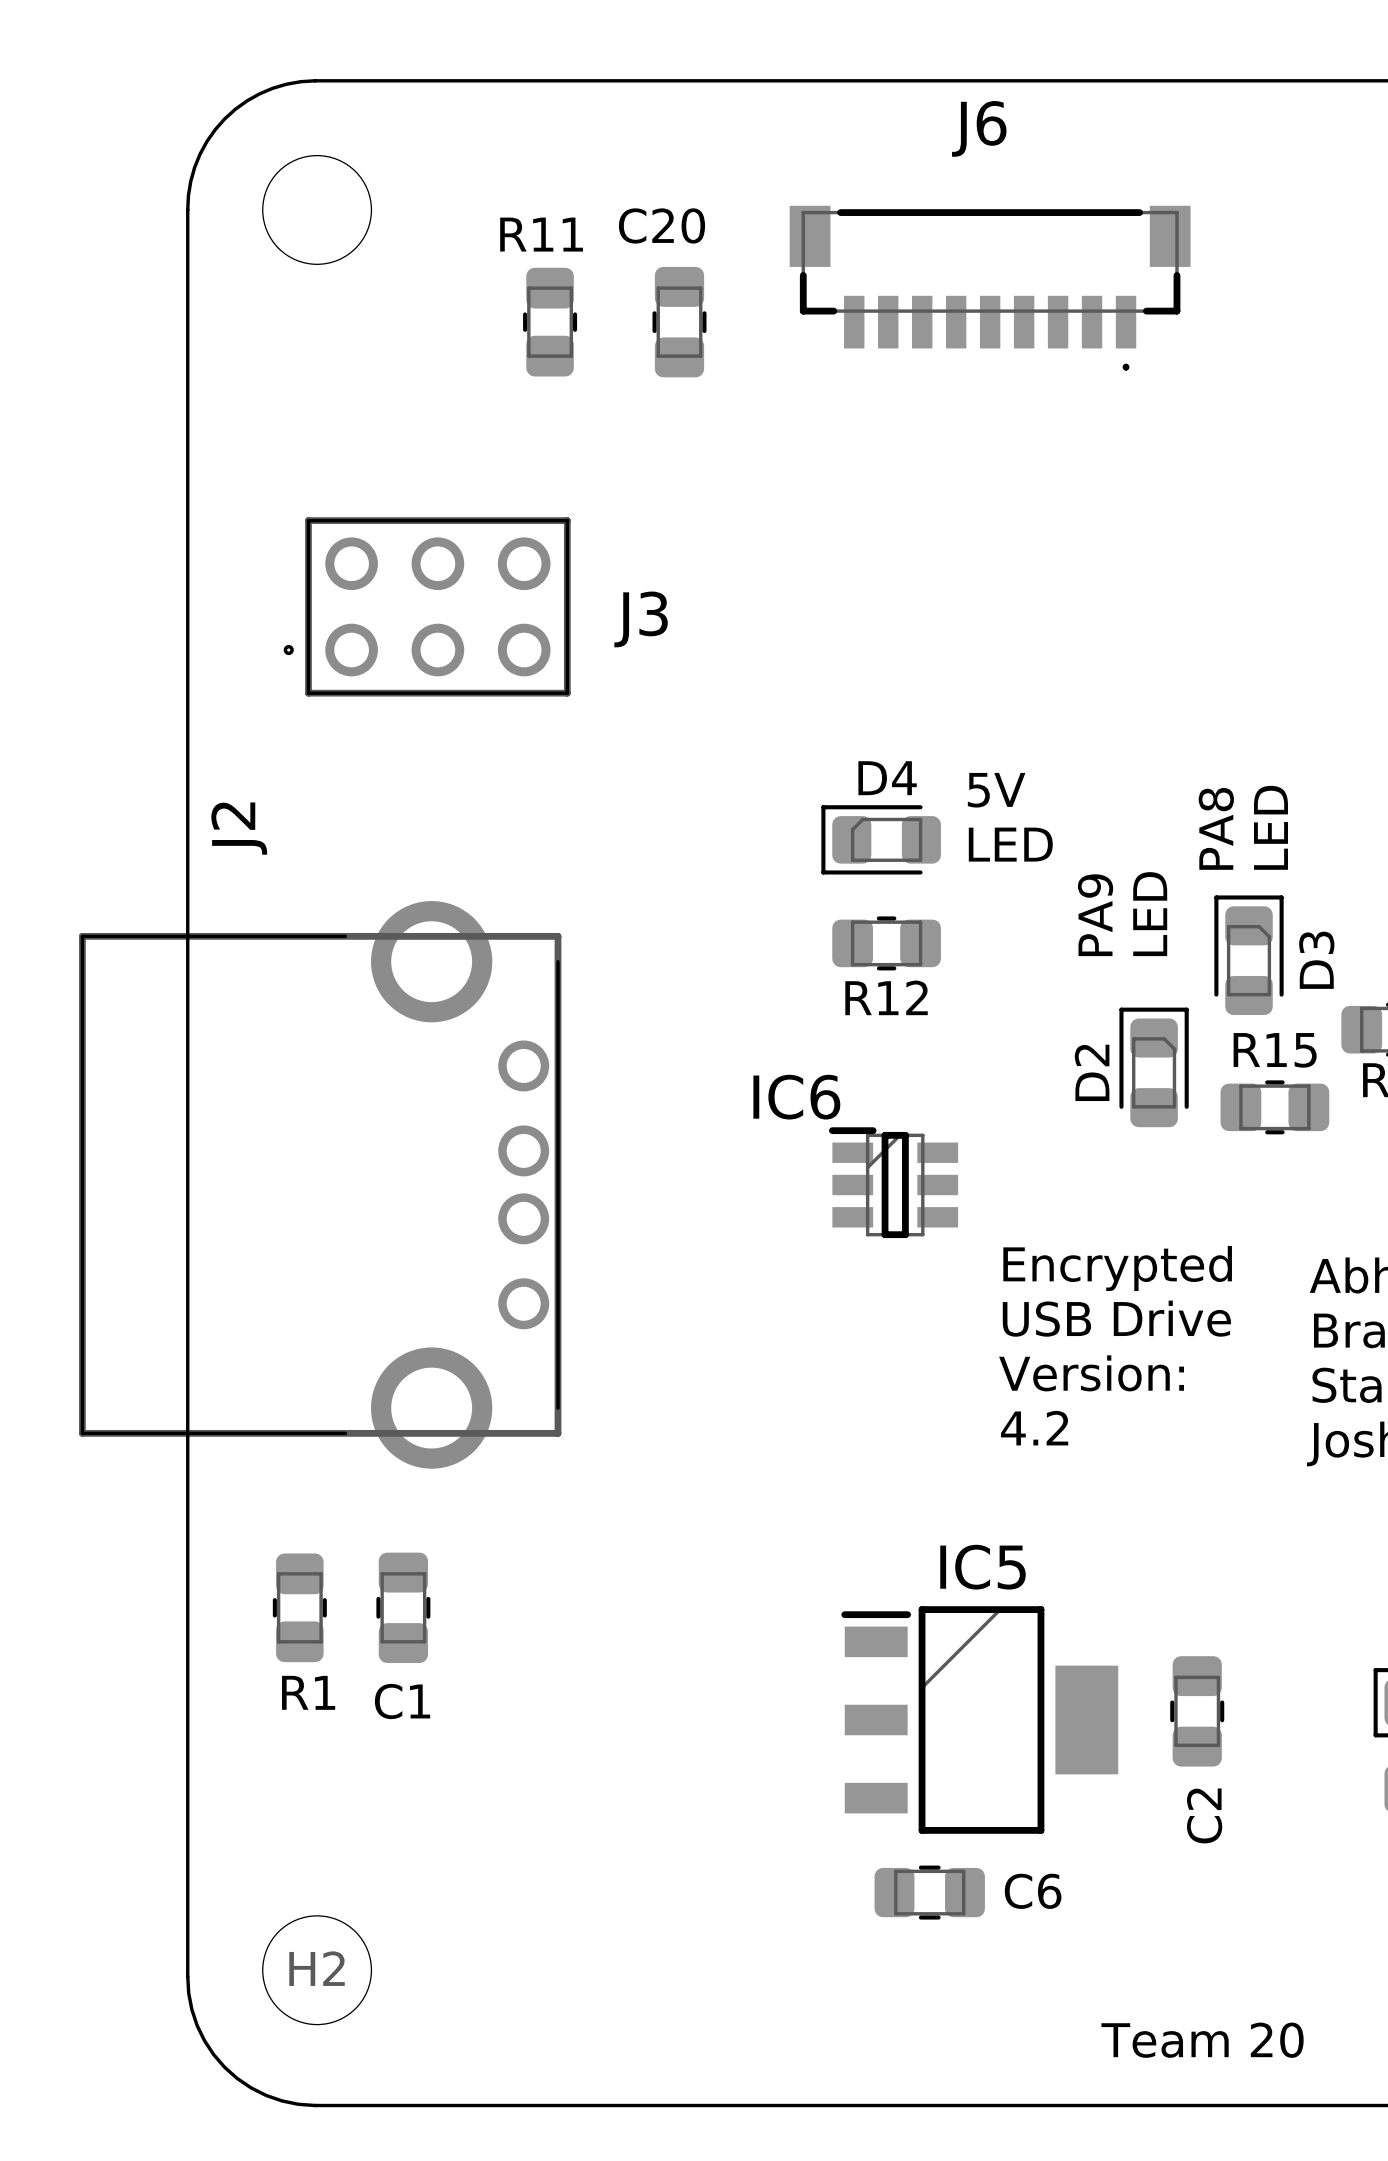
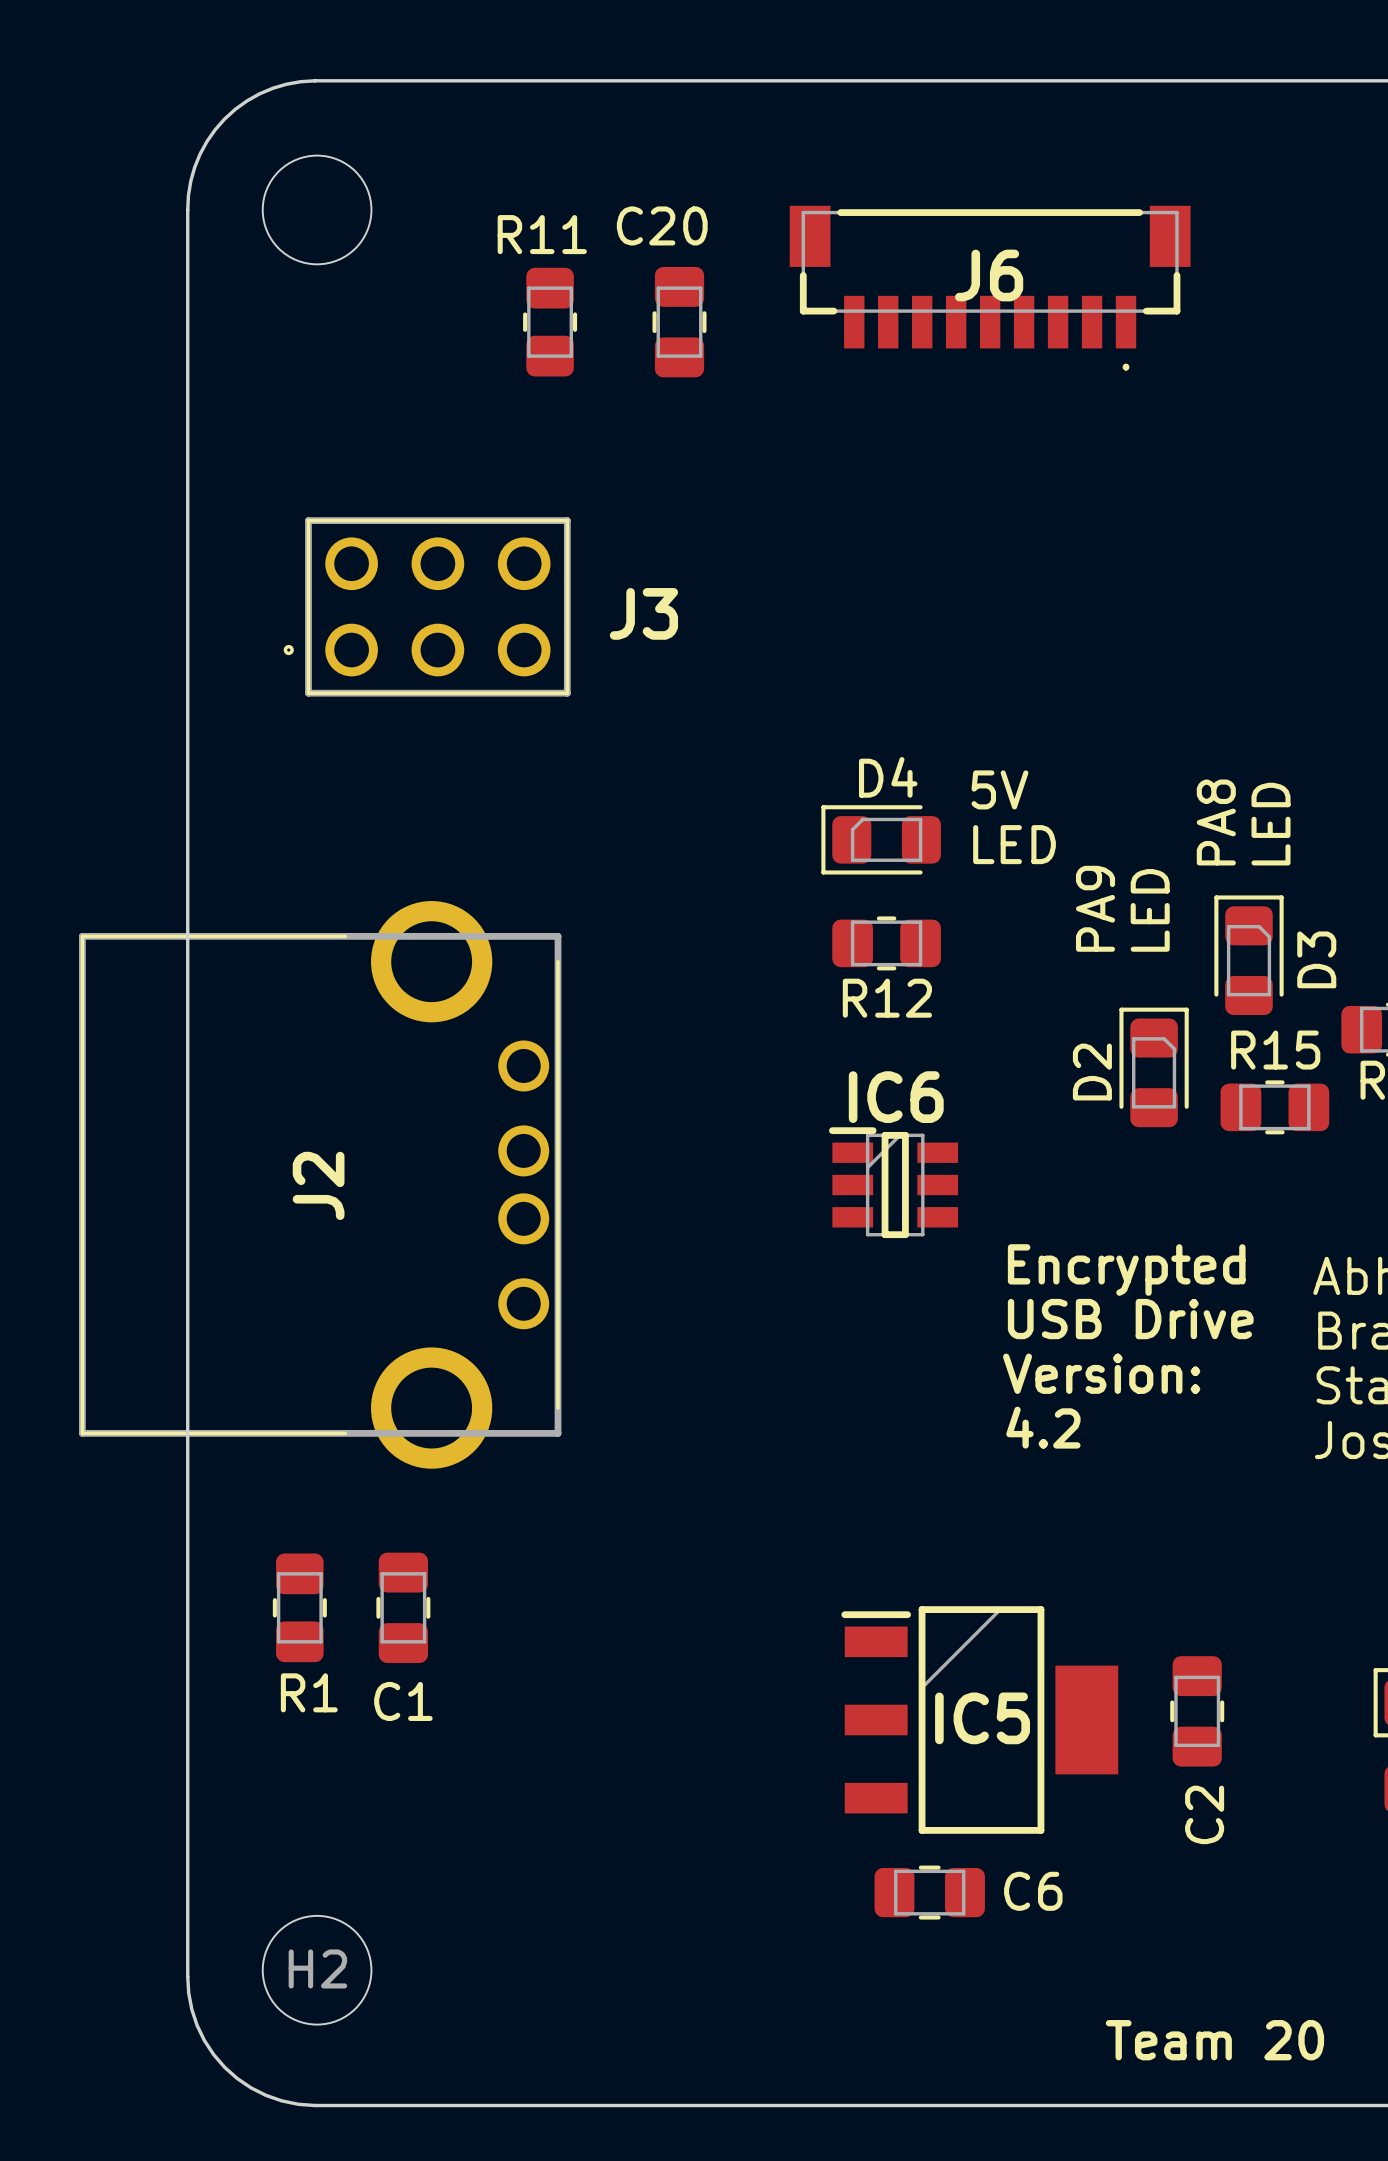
J6 name position: J6 (979, 128) -> J6 (989, 275)
J2 name position: J2 (239, 828) -> J2 (318, 1185)
IC6 name position: IC6 (796, 1097) -> IC6 (896, 1097)
IC5 name position: IC5 (982, 1567) -> IC5 (982, 1718)

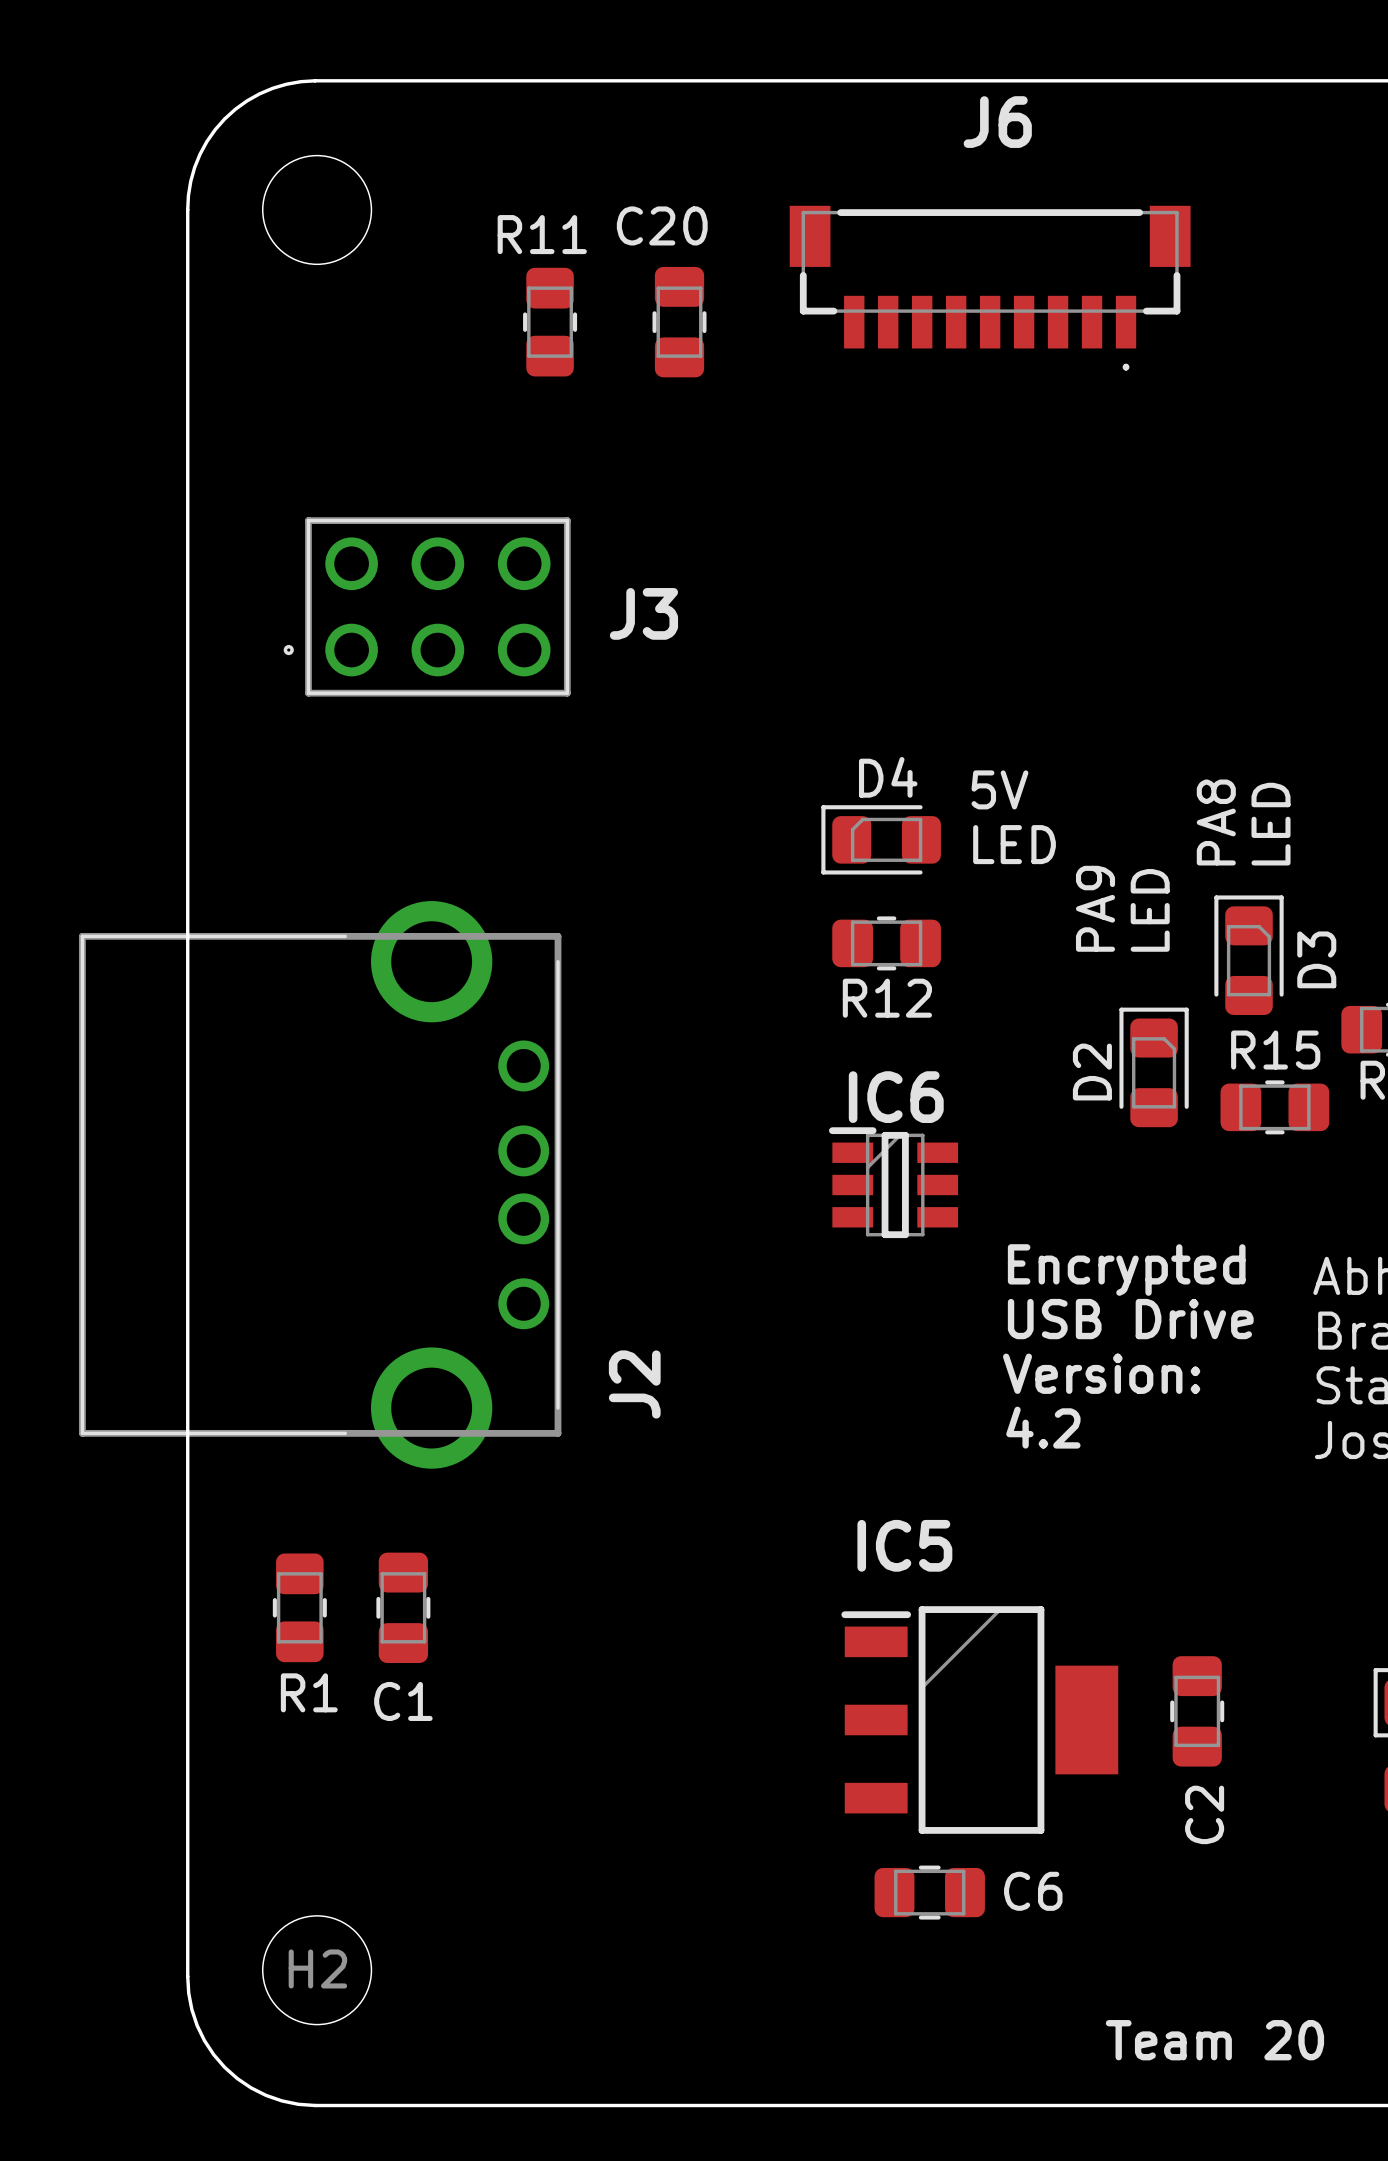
J6 name position: J6 (989, 275) -> J6 (997, 122)
J2 name position: J2 (318, 1185) -> J2 (634, 1384)
IC5 name position: IC5 (982, 1718) -> IC5 (904, 1545)

